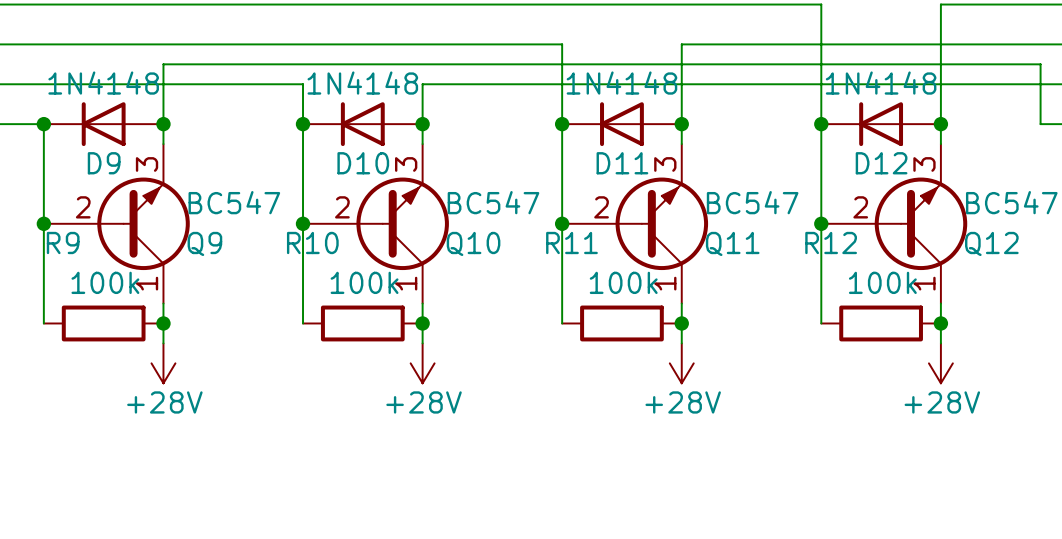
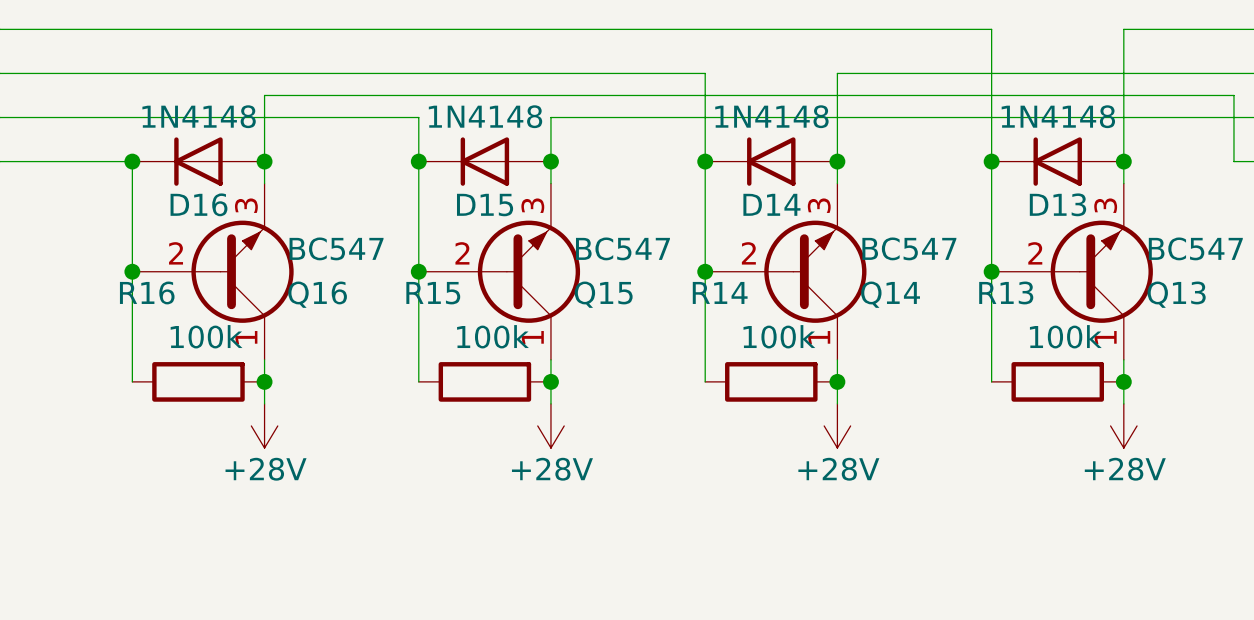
D9 name: D9 (104, 163) -> D16 (198, 204)
D10 name: D10 (363, 163) -> D15 (485, 205)
D11 name: D11 (622, 163) -> D14 (771, 204)
D12 name: D12 (881, 163) -> D13 (1057, 204)
R9 name: R9 (63, 242) -> R16 (147, 292)
R10 name: R10 (312, 242) -> R15 (433, 293)
R11 name: R11 (571, 242) -> R14 (720, 292)
R12 name: R12 (831, 242) -> R13 (1006, 292)
Q9 name: Q9 (204, 243) -> Q16 (317, 294)
Q10 name: Q10 (473, 243) -> Q15 (603, 294)
Q11 name: Q11 (732, 243) -> Q14 (890, 294)
Q12 name: Q12 (991, 243) -> Q13 (1176, 294)

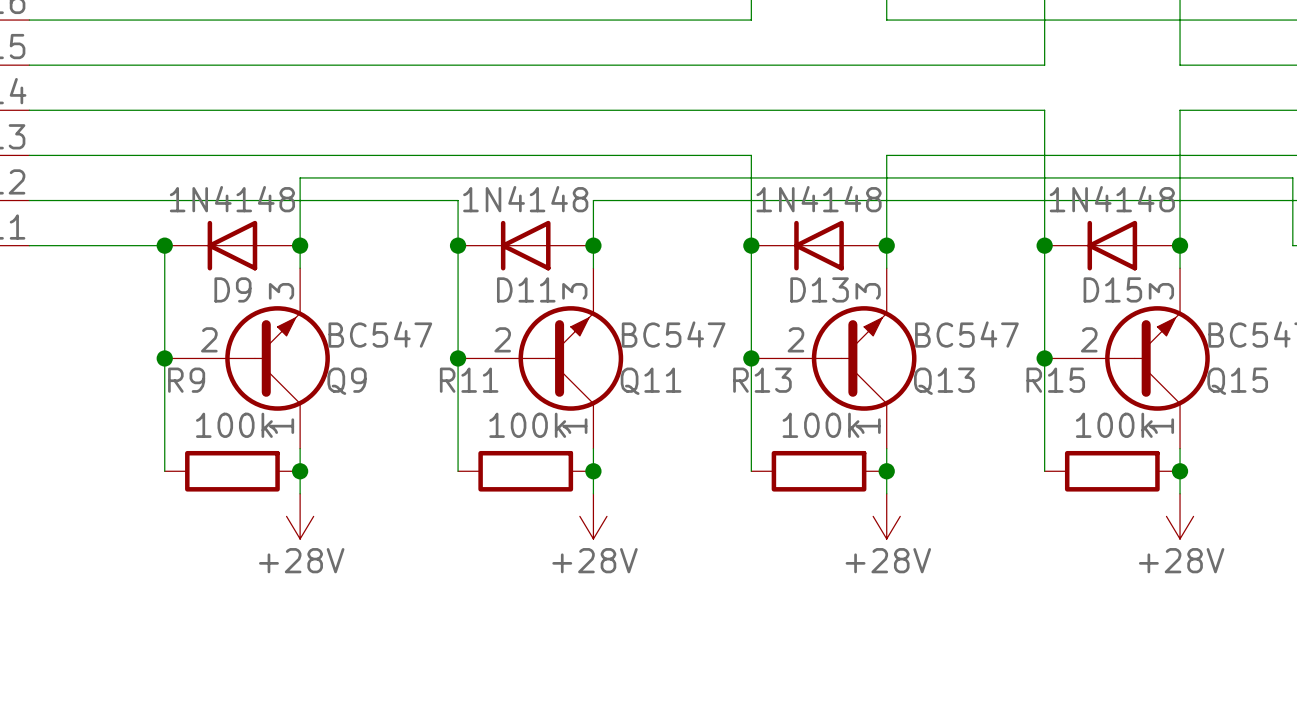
D16 name: D16 (198, 204) -> D9 (232, 289)
D14 name: D14 (771, 204) -> D13 (819, 289)
D13 name: D13 (1057, 204) -> D15 (1112, 289)
D15 name: D15 (485, 205) -> D11 (526, 289)
R16 name: R16 (147, 292) -> R9 (186, 380)
R14 name: R14 (720, 292) -> R13 (762, 380)
R13 name: R13 (1006, 292) -> R15 (1055, 380)
R15 name: R15 (433, 293) -> R11 (469, 380)
Q16 name: Q16 (317, 294) -> Q9 (347, 381)
Q15 name: Q15 (603, 294) -> Q11 (651, 381)
Q14 name: Q14 (890, 294) -> Q13 (944, 381)
Q13 name: Q13 (1176, 294) -> Q15 (1237, 381)

